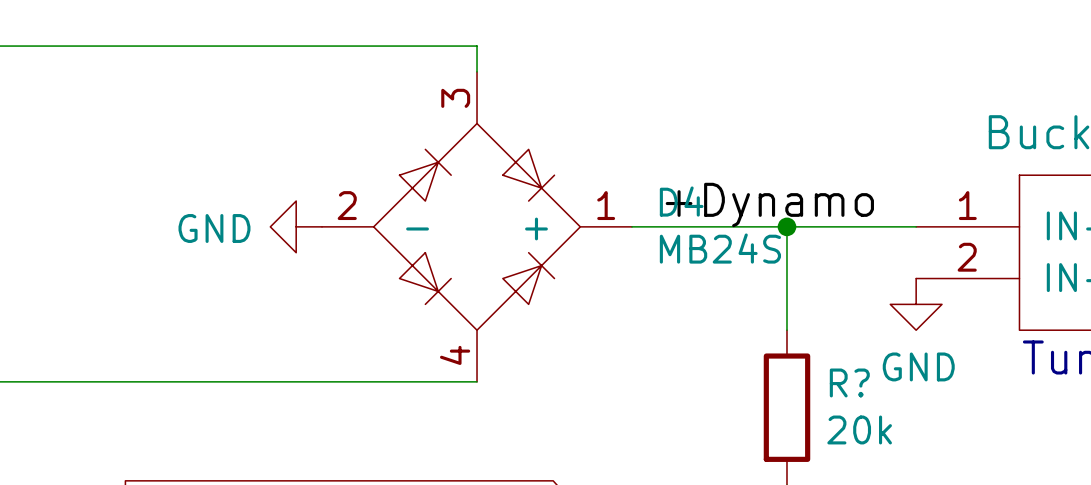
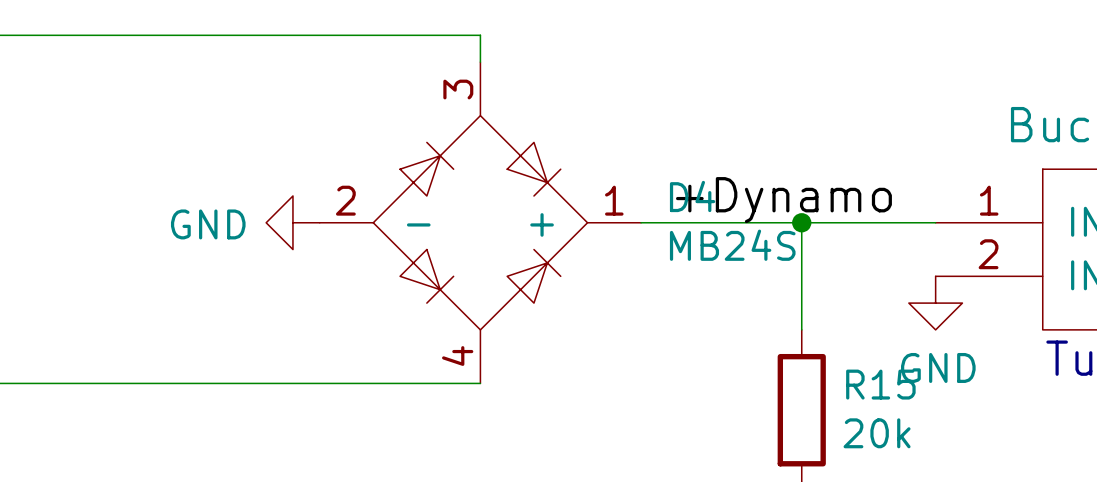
R? name: R? (849, 382) -> R15 (880, 384)

